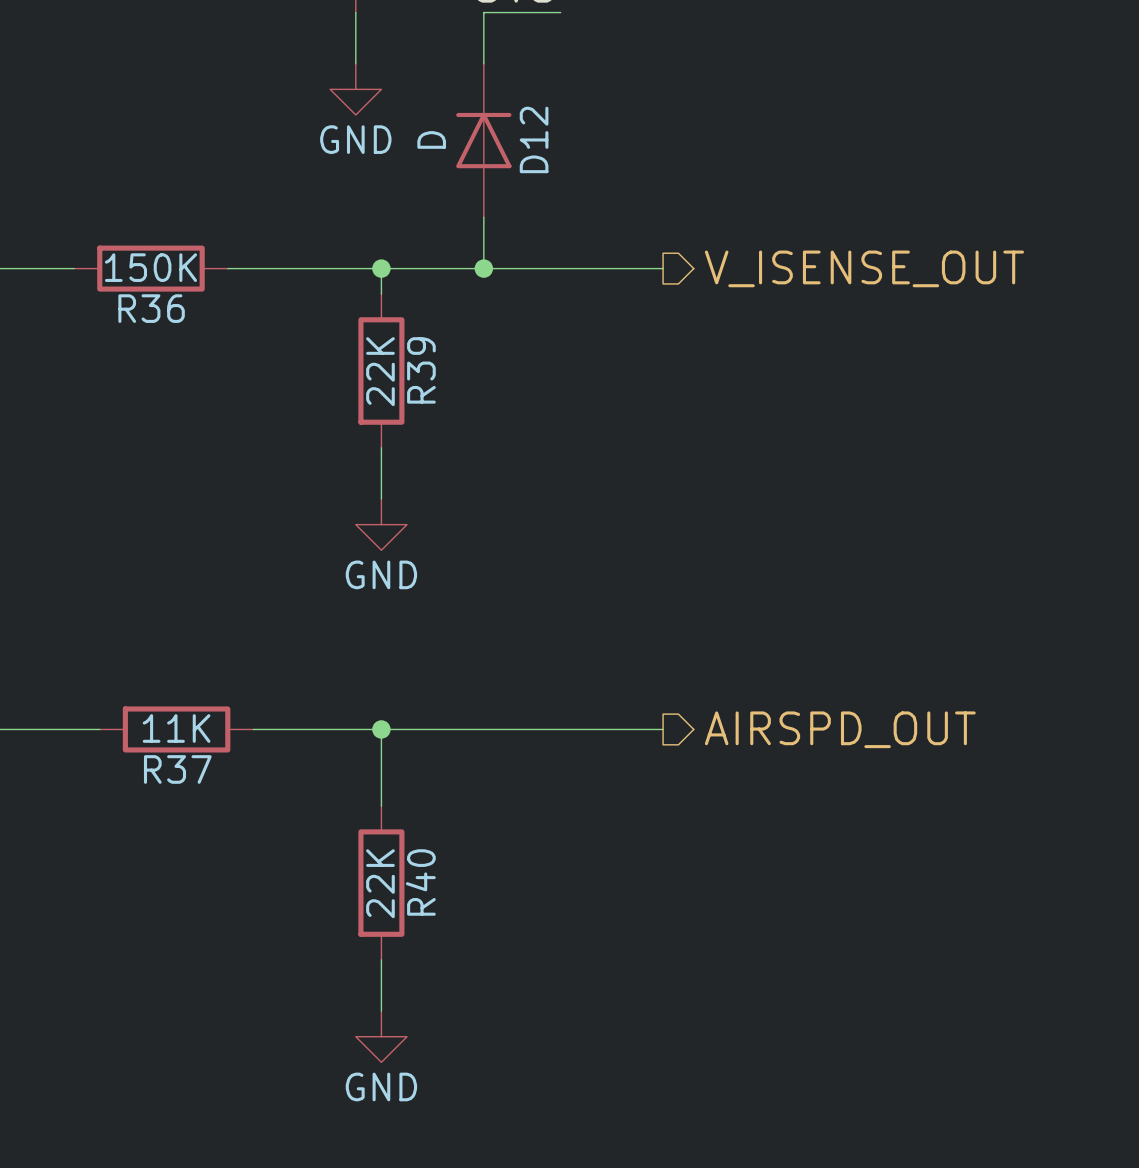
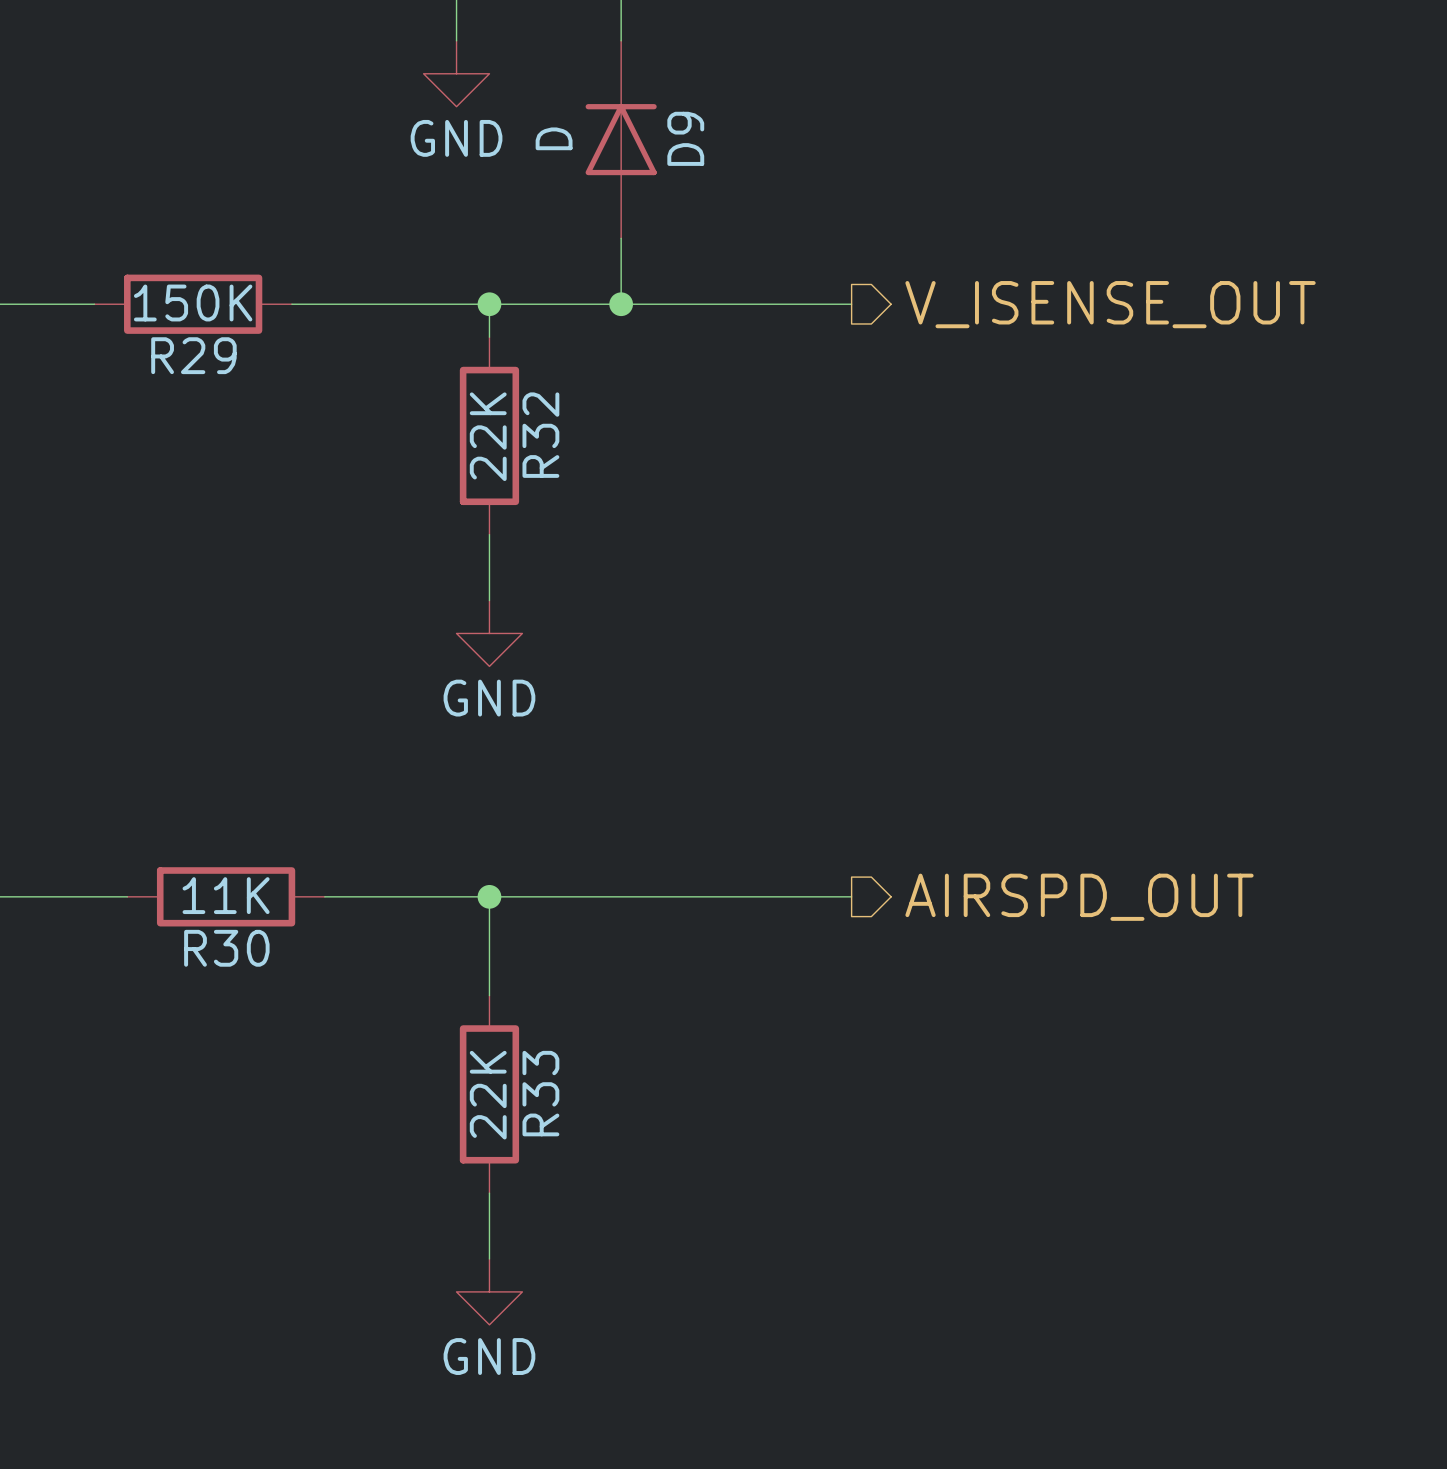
D12 name: D12 (534, 139) -> D9 (685, 138)
R36 name: R36 (151, 308) -> R29 (193, 355)
R39 name: R39 (421, 370) -> R32 (540, 435)
R37 name: R37 (177, 769) -> R30 (226, 948)
R40 name: R40 (420, 882) -> R33 (540, 1093)

